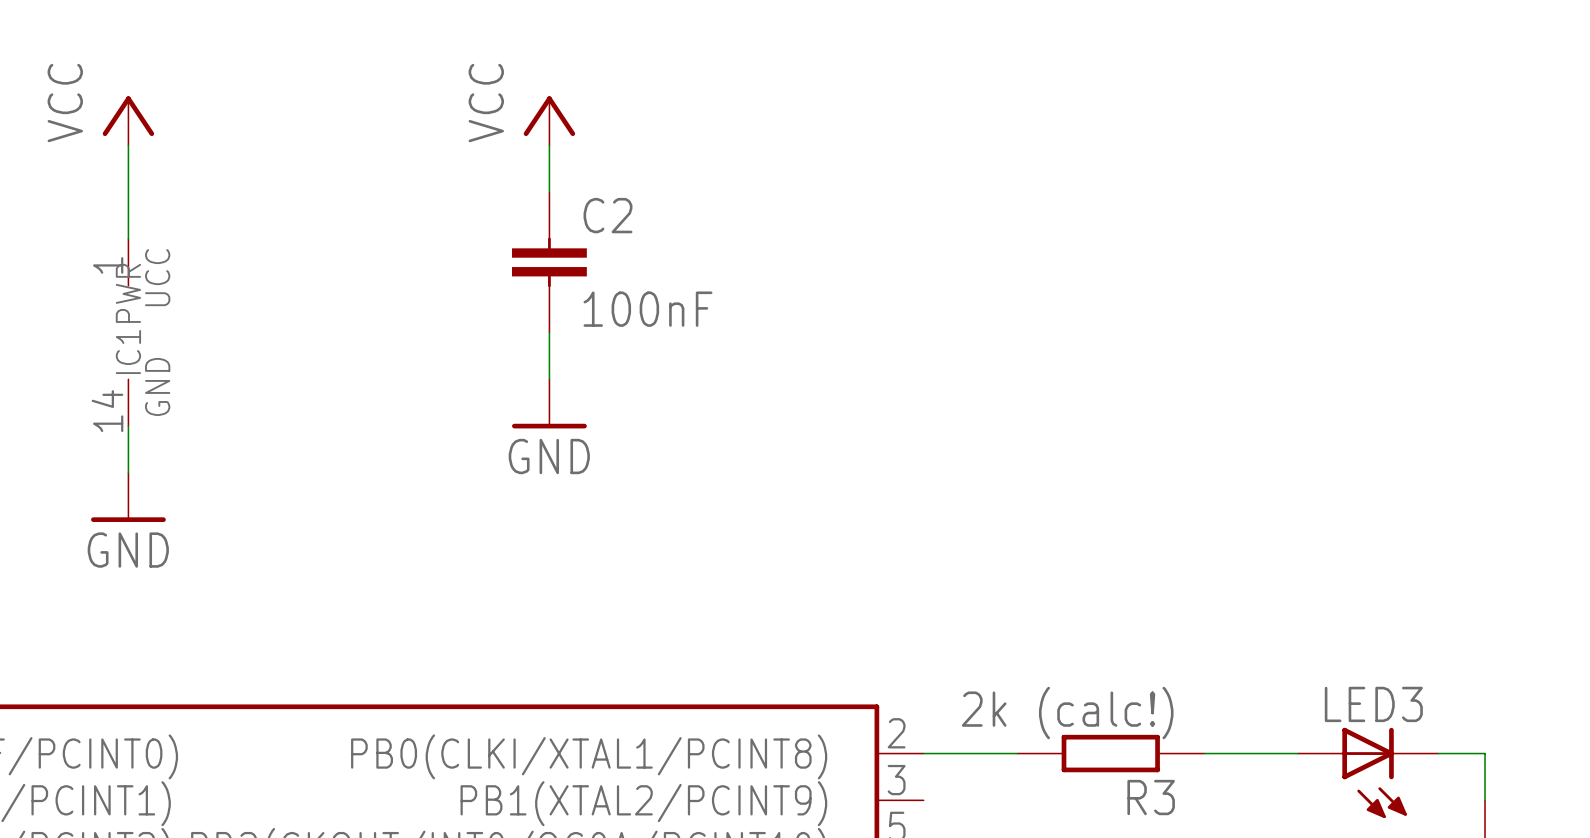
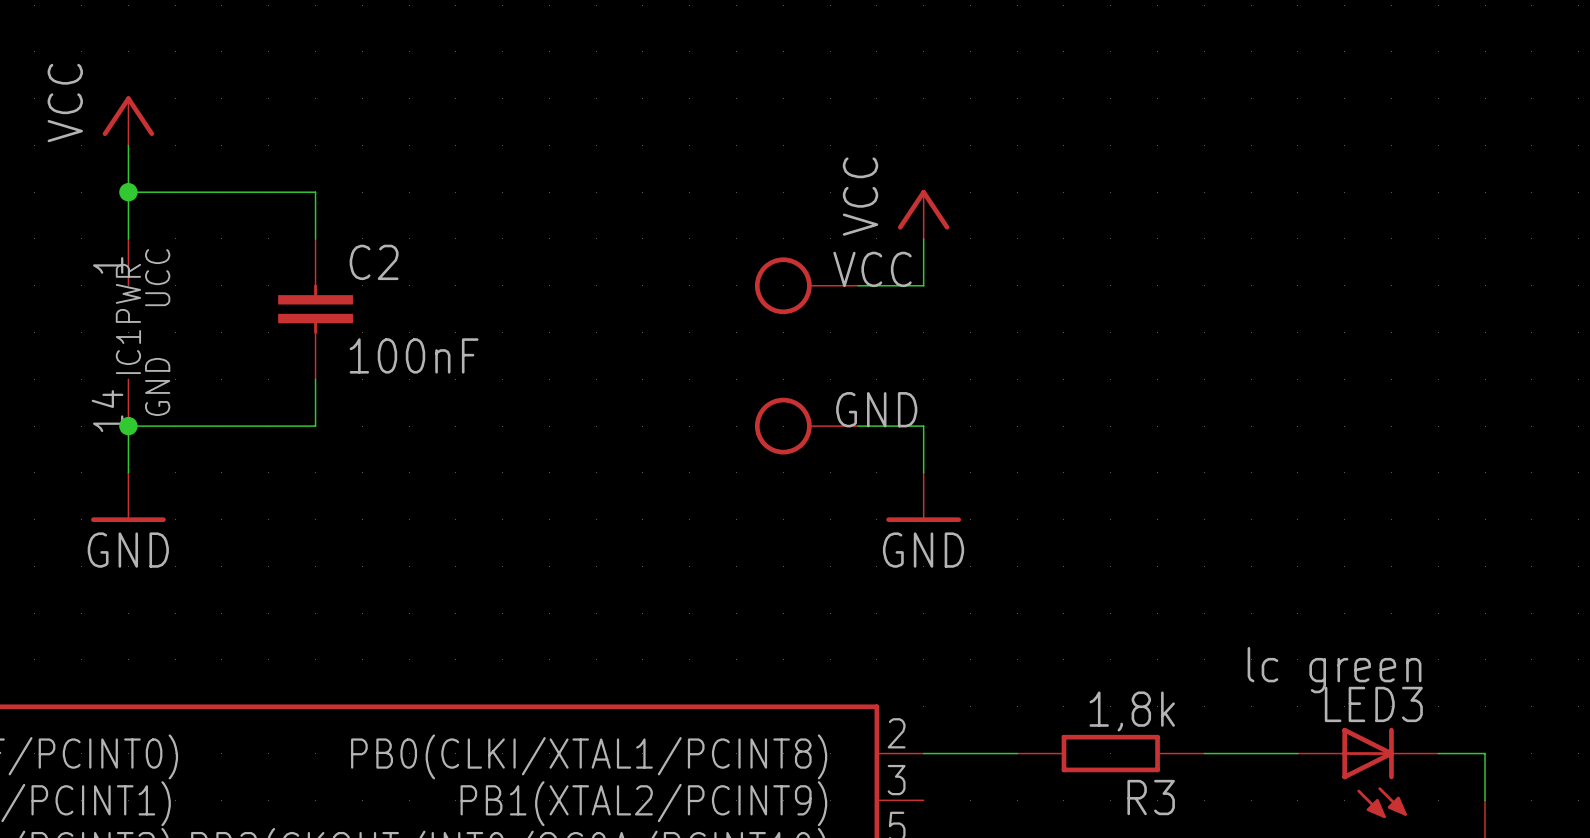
power symbol position: VCC (549, 120) -> VCC (923, 214)
wire: (549, 145) (549, 192) -> none
wire: none -> (128, 192) (315, 192) (315, 238)
junction: none -> (128, 192)
wire: none -> (923, 238) (923, 285) (858, 285)
C2 position: (549, 262) -> (315, 309)
label: none -> VCC (872, 269)
part: none -> (806, 285)
wire: (549, 332) (549, 379) -> none
wire: none -> (315, 379) (315, 426) (128, 426)
power symbol position: GND (549, 403) -> GND (923, 497)
label: none -> GND (876, 409)
junction: none -> (128, 426)
part: none -> (806, 426)
wire: none -> (858, 426) (923, 426) (923, 472)
LED3 value: none -> lc green (1334, 670)
R3 value: 2k (calc!) (1067, 713) -> 1,8k (1132, 711)

